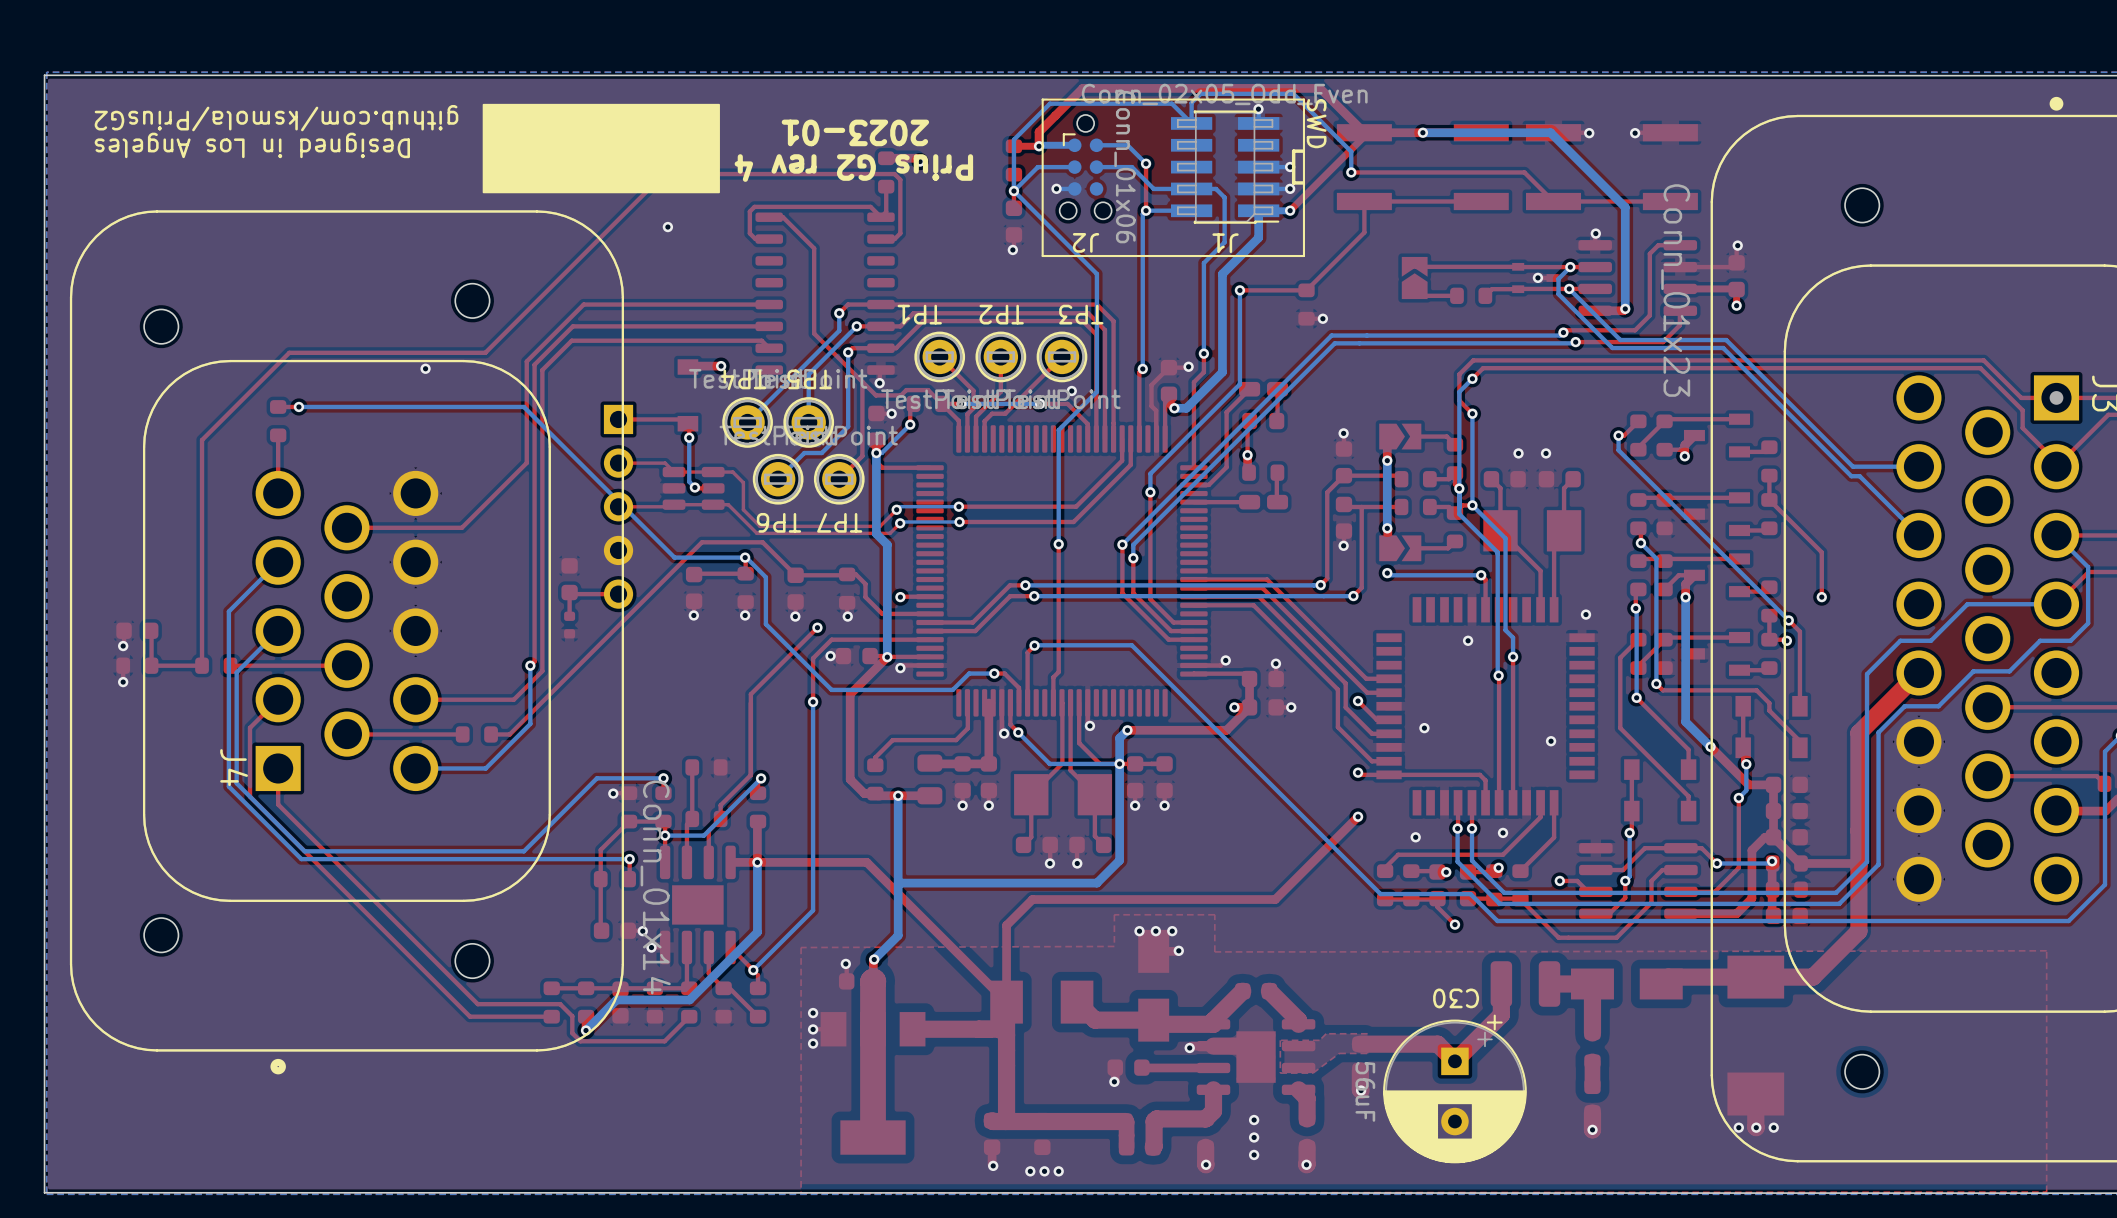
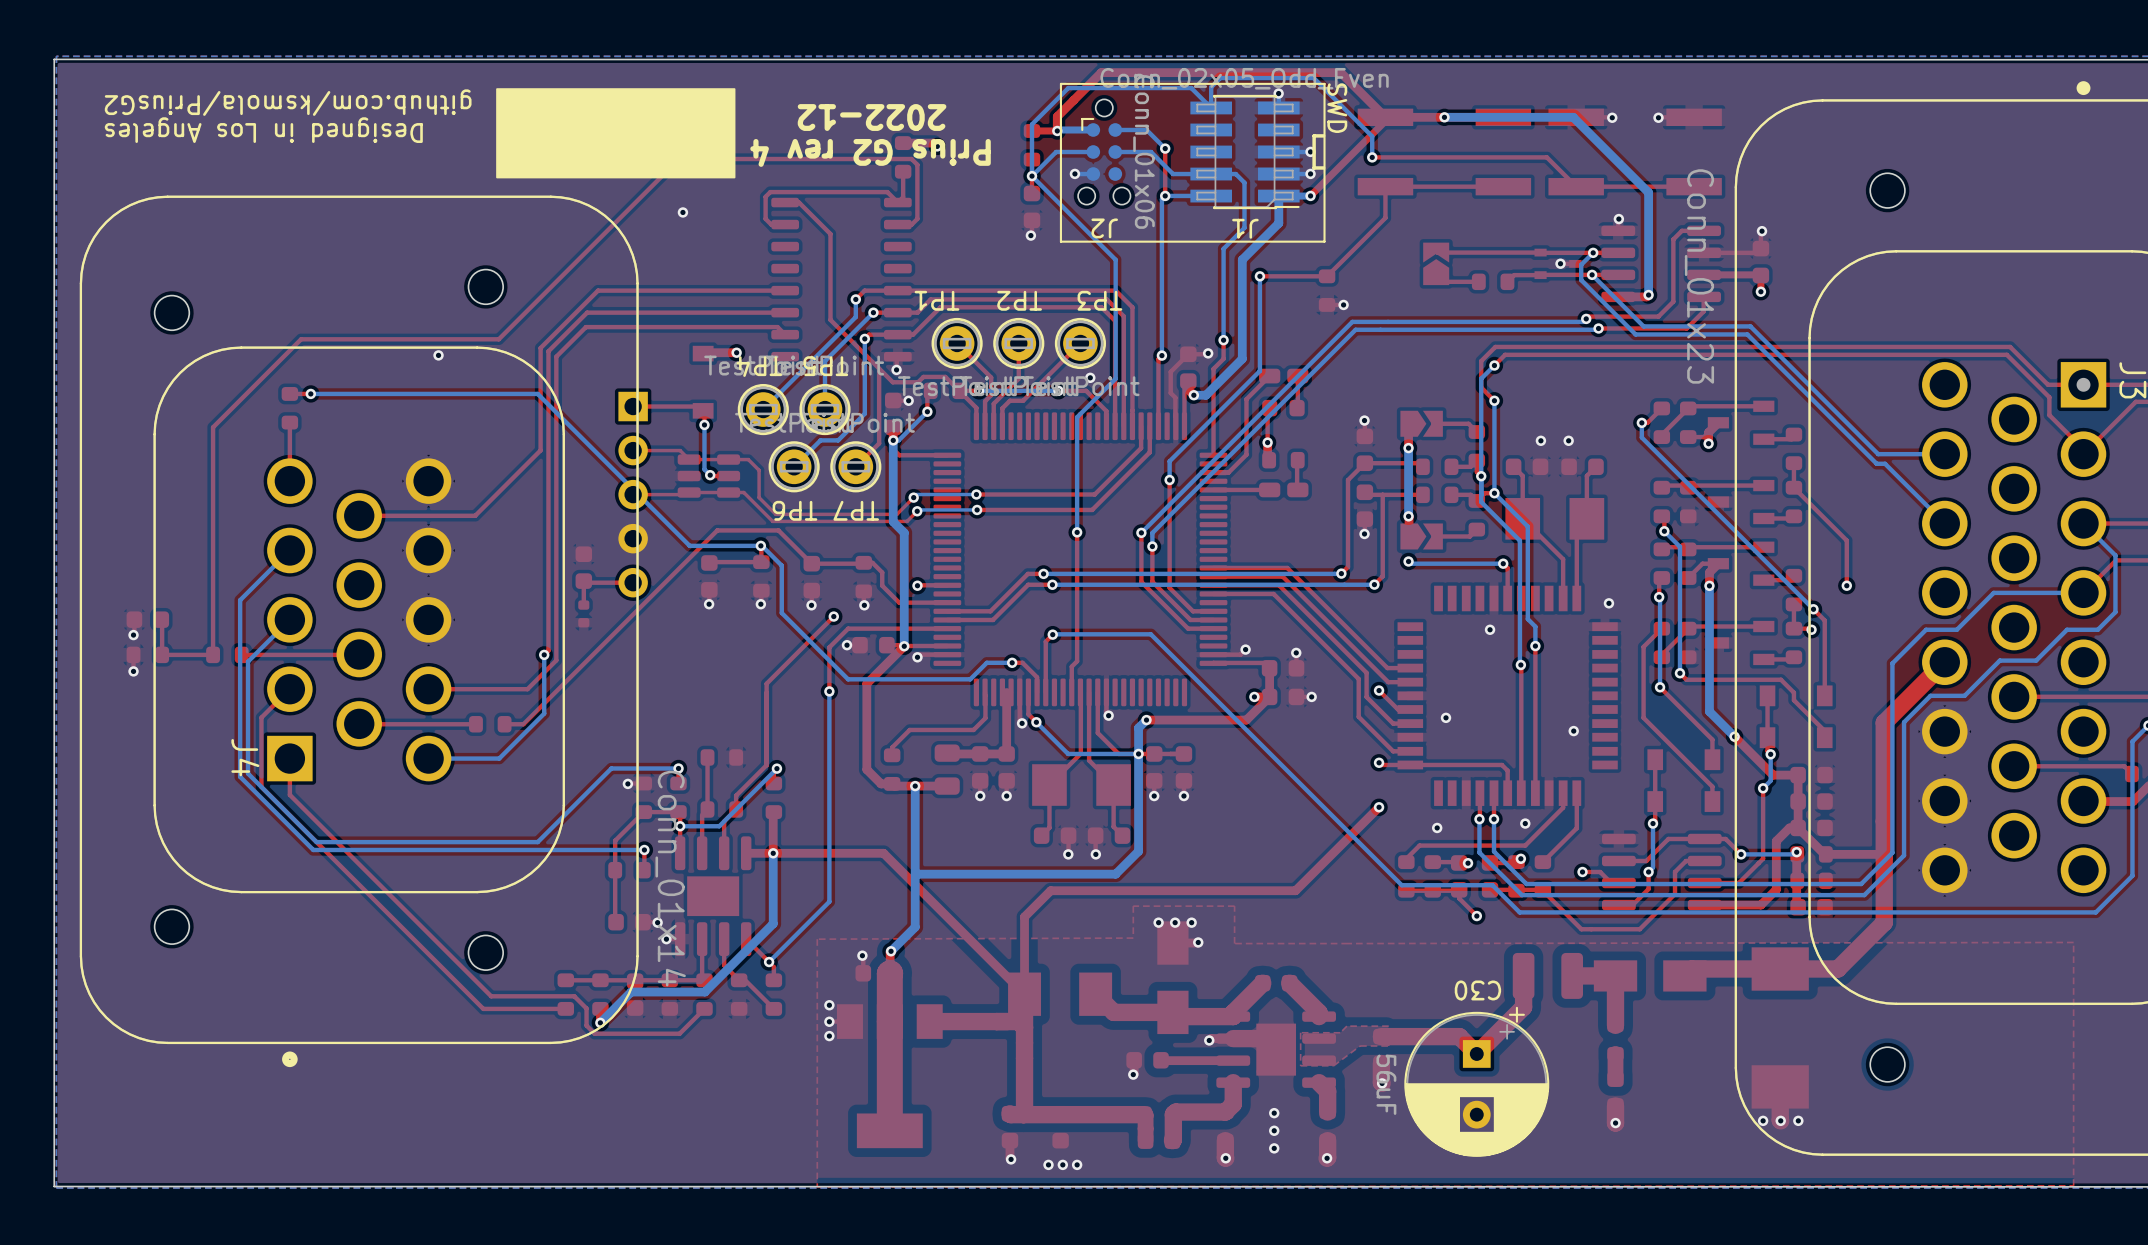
text: 2023-01 (855, 132) -> 2022-12 (872, 117)

